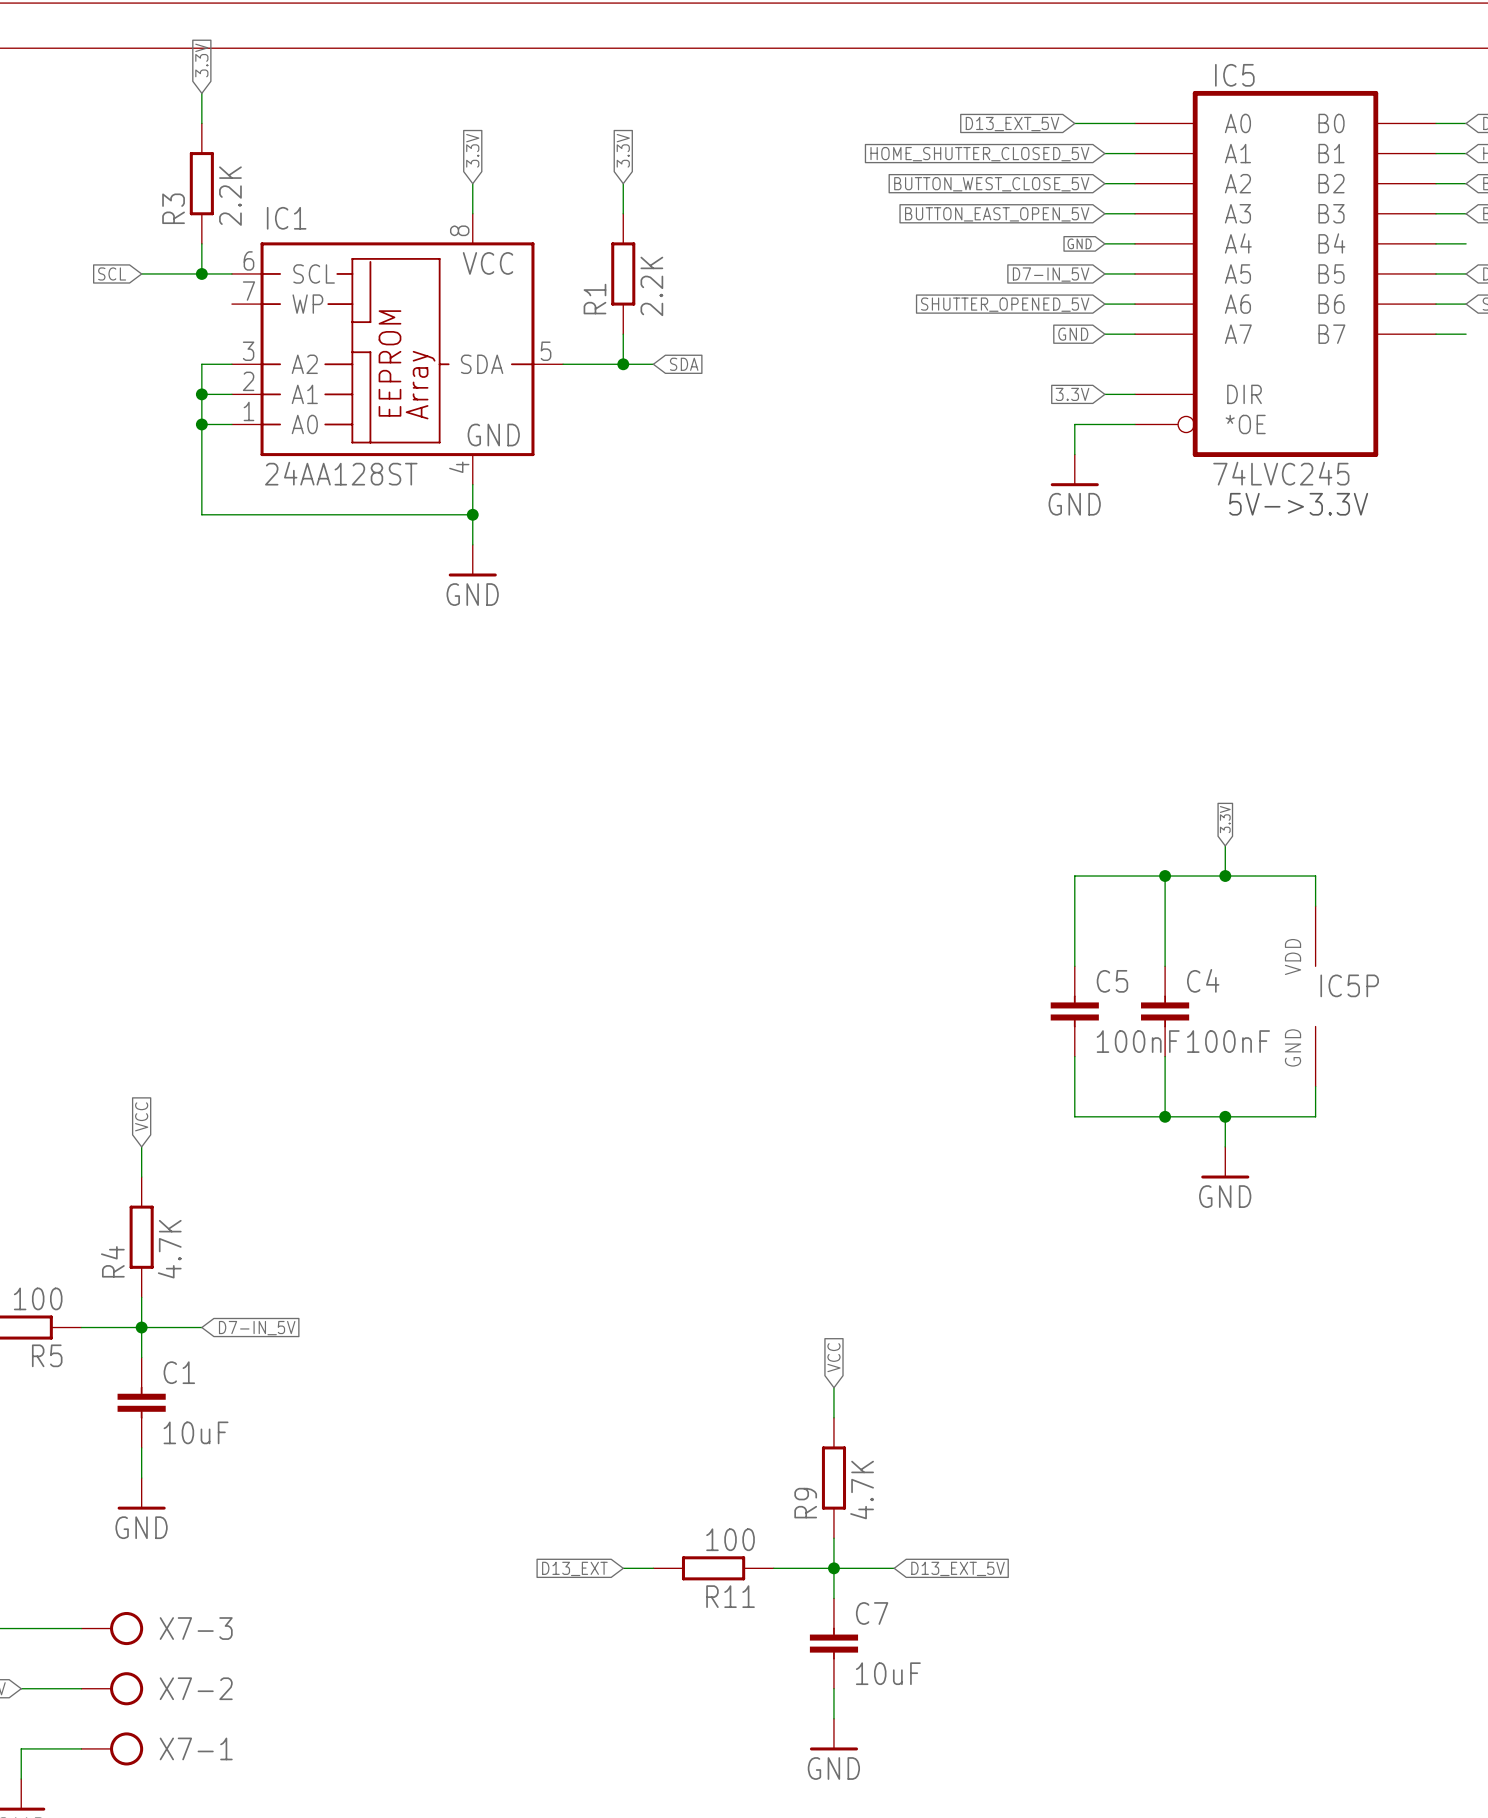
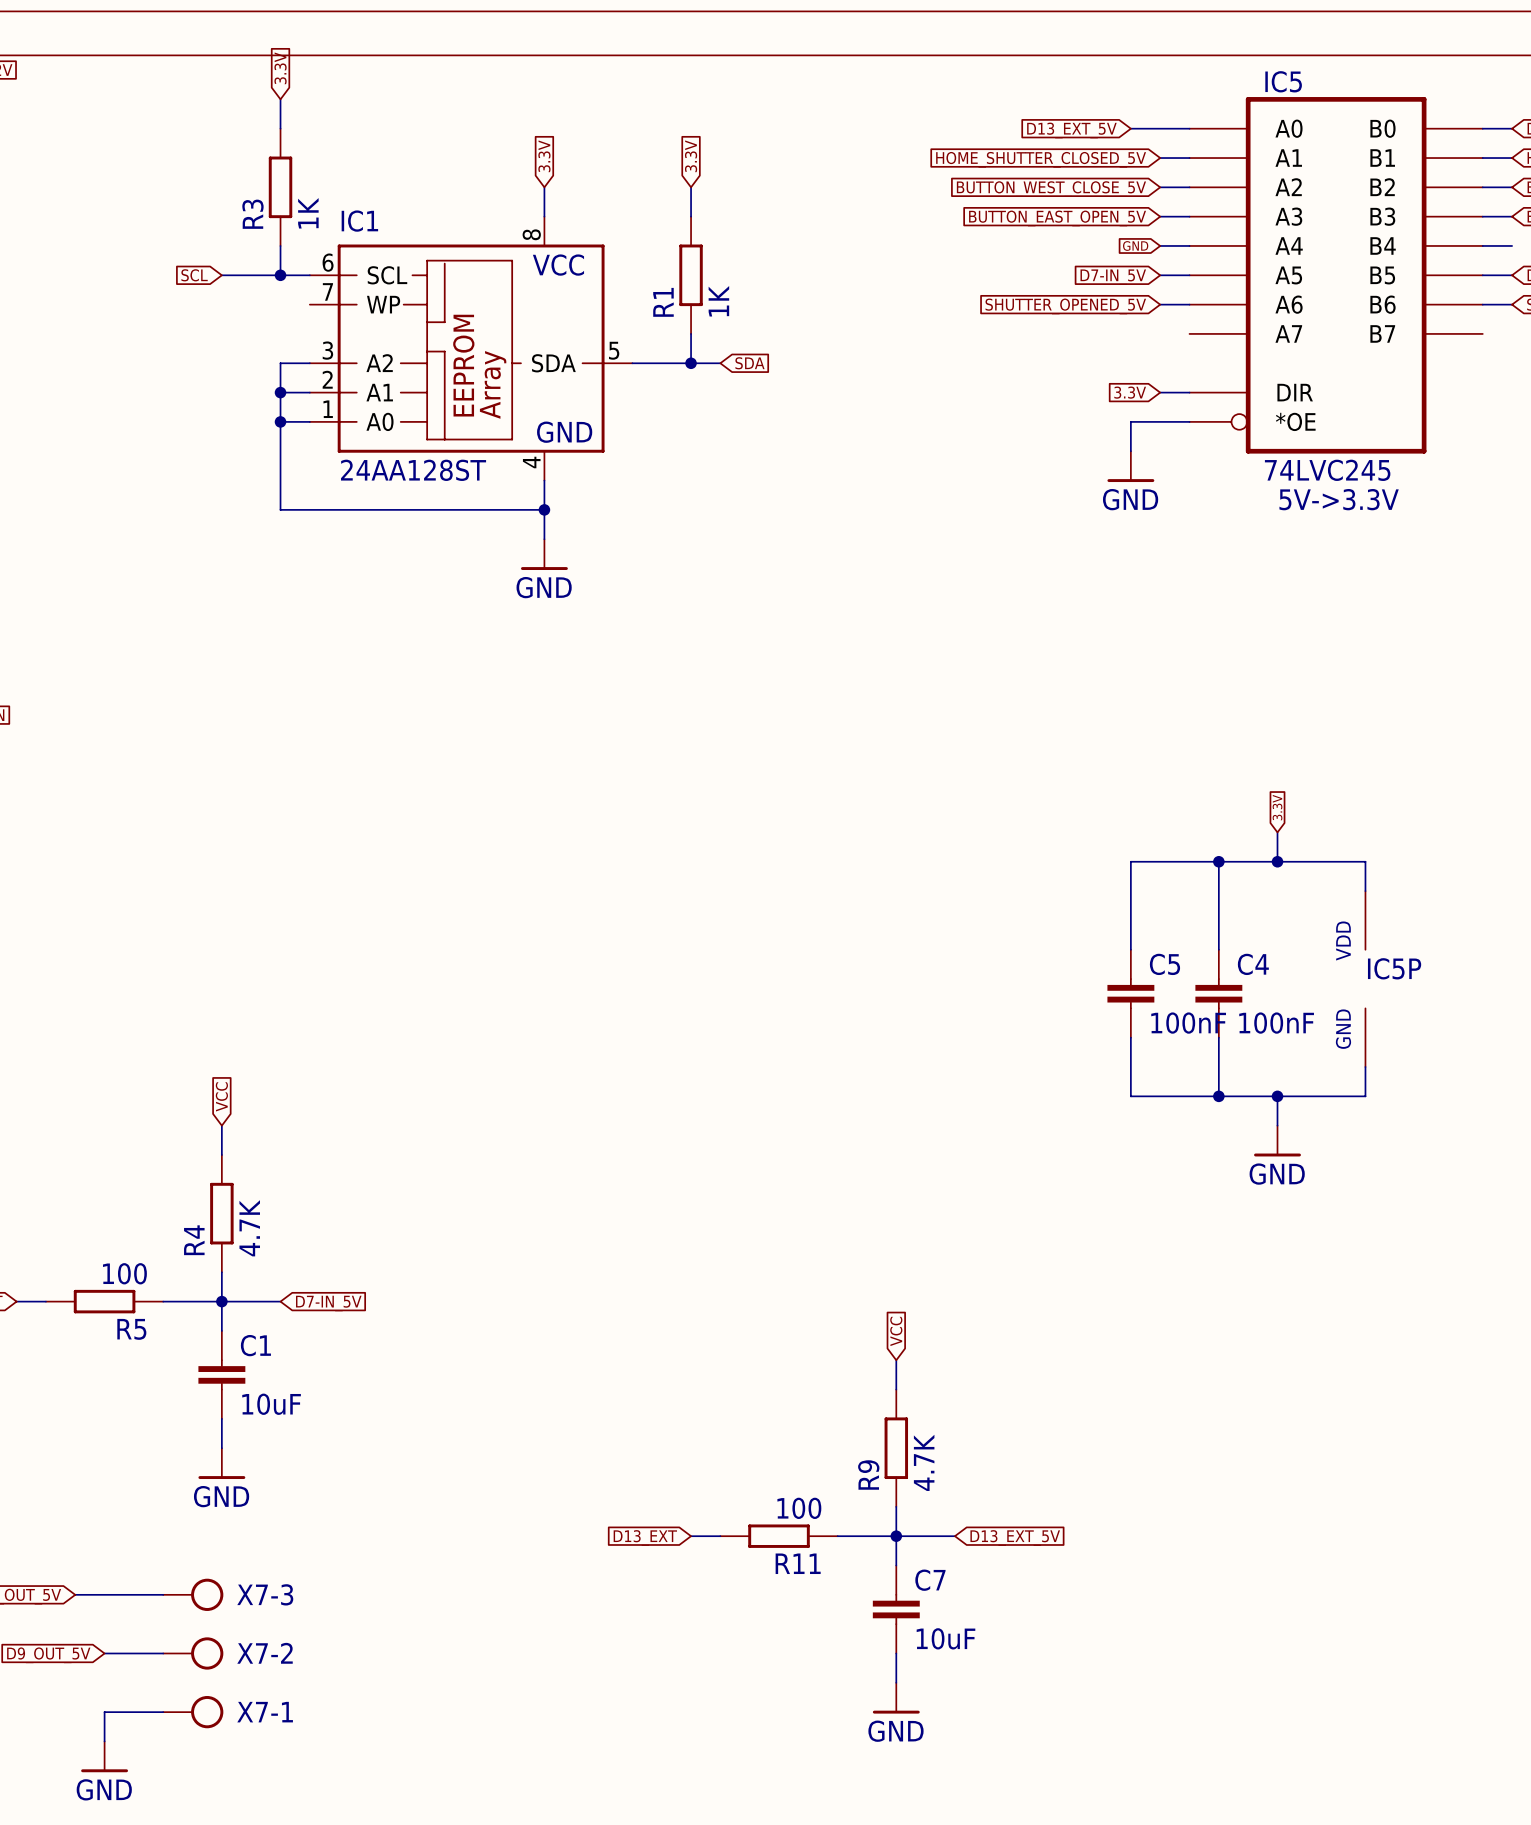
R3 value: 2.2K (230, 196) -> 1K (308, 213)
R1 value: 2.2K (651, 286) -> 1K (718, 301)
global label: GND (1073, 334) -> none
wire: (1104, 334) (1134, 334) -> none
wire: (1436, 334) (1466, 334) -> none

